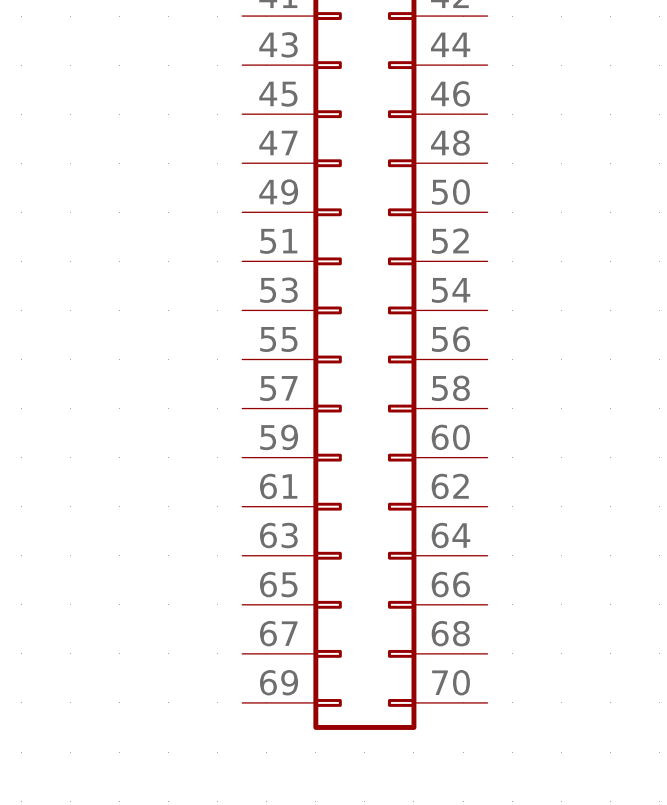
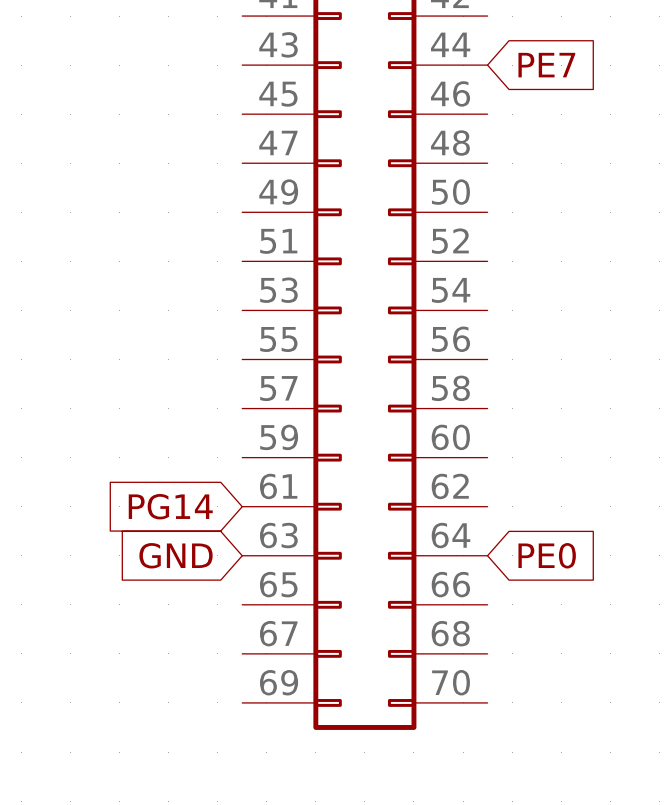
global label: none -> PE7 (546, 65)
global label: none -> PG14 (170, 506)
global label: none -> GND (176, 555)
global label: none -> PE0 (547, 555)

